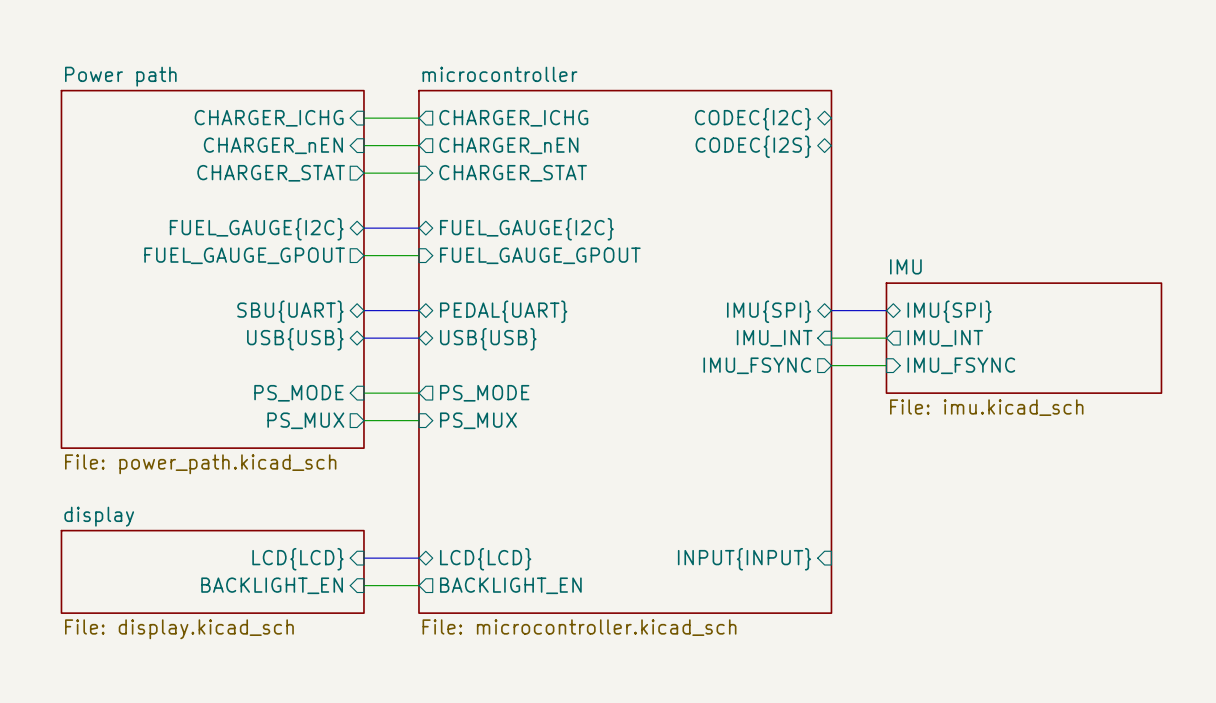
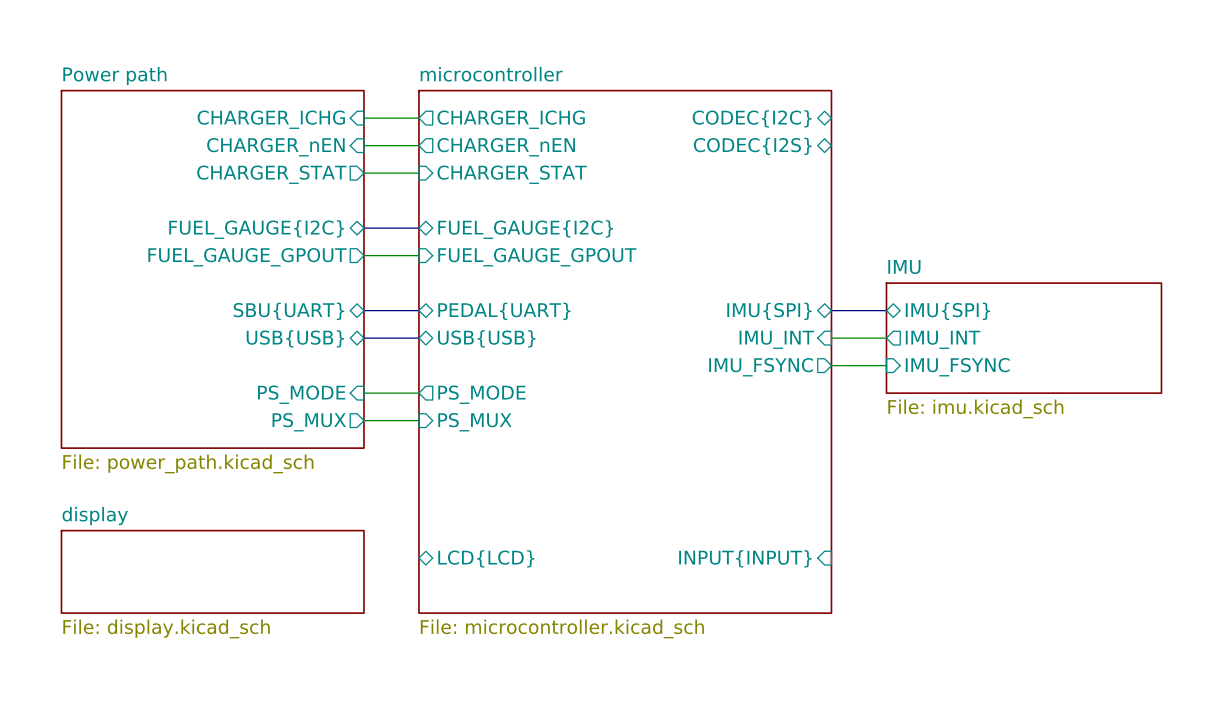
bus: (363, 558) (418, 558) -> none
sheet pin: LCD{LCD} (297, 559) -> none
sheet pin: BACKLIGHT_EN (272, 585) -> none
wire: (363, 585) (418, 585) -> none
sheet pin: BACKLIGHT_EN (510, 585) -> none

